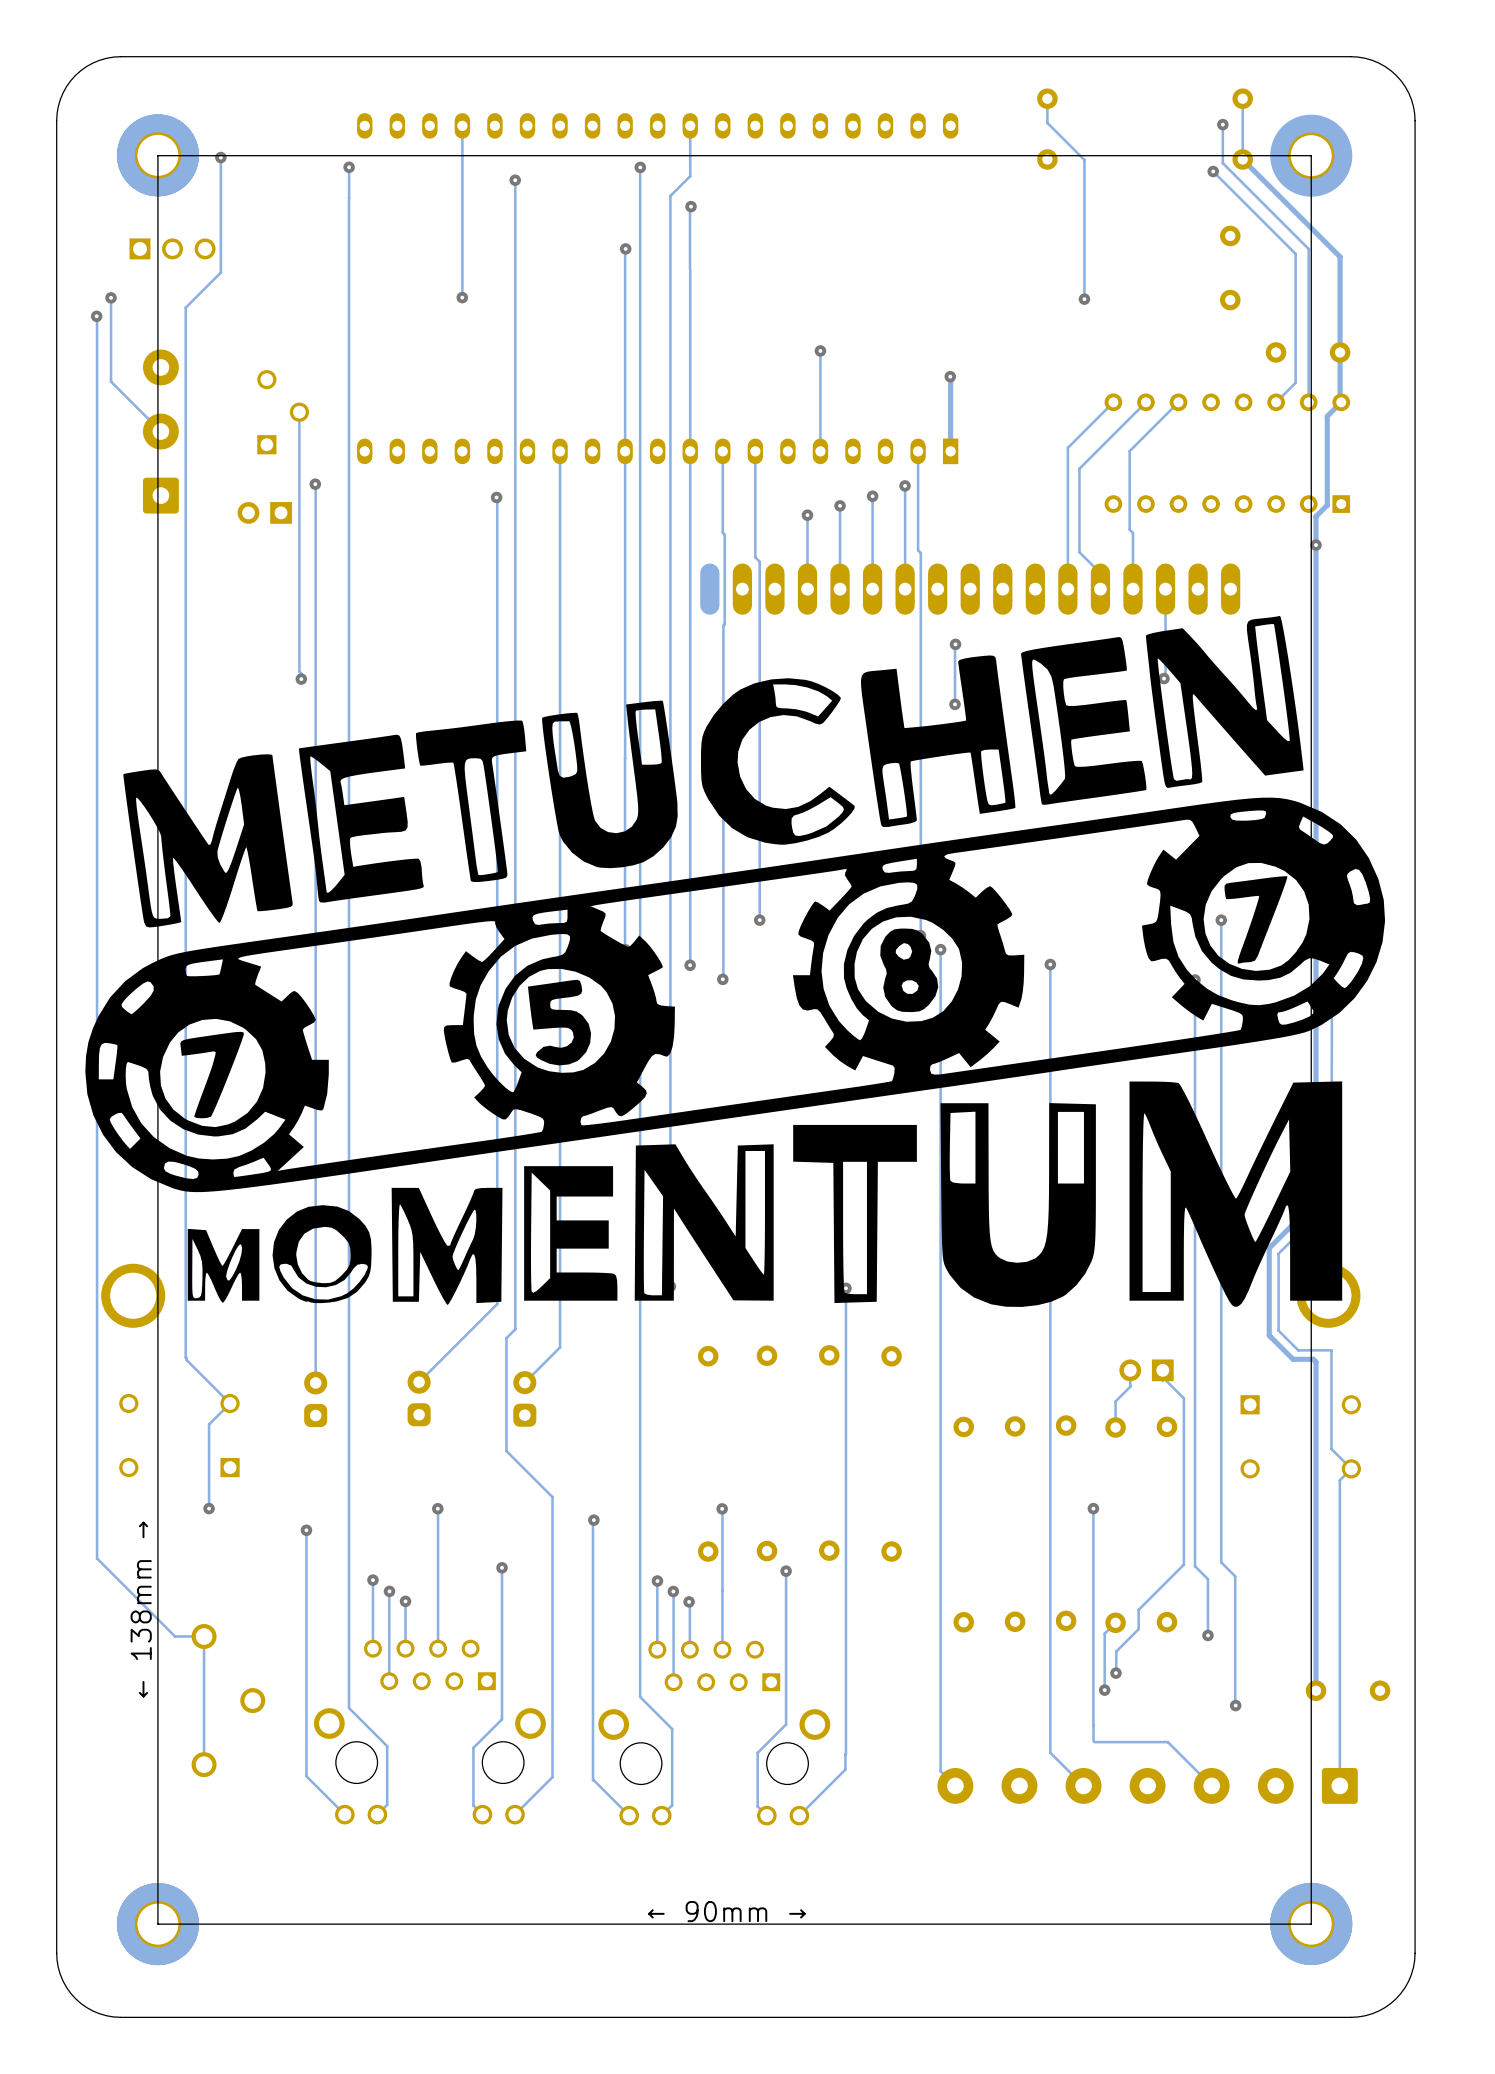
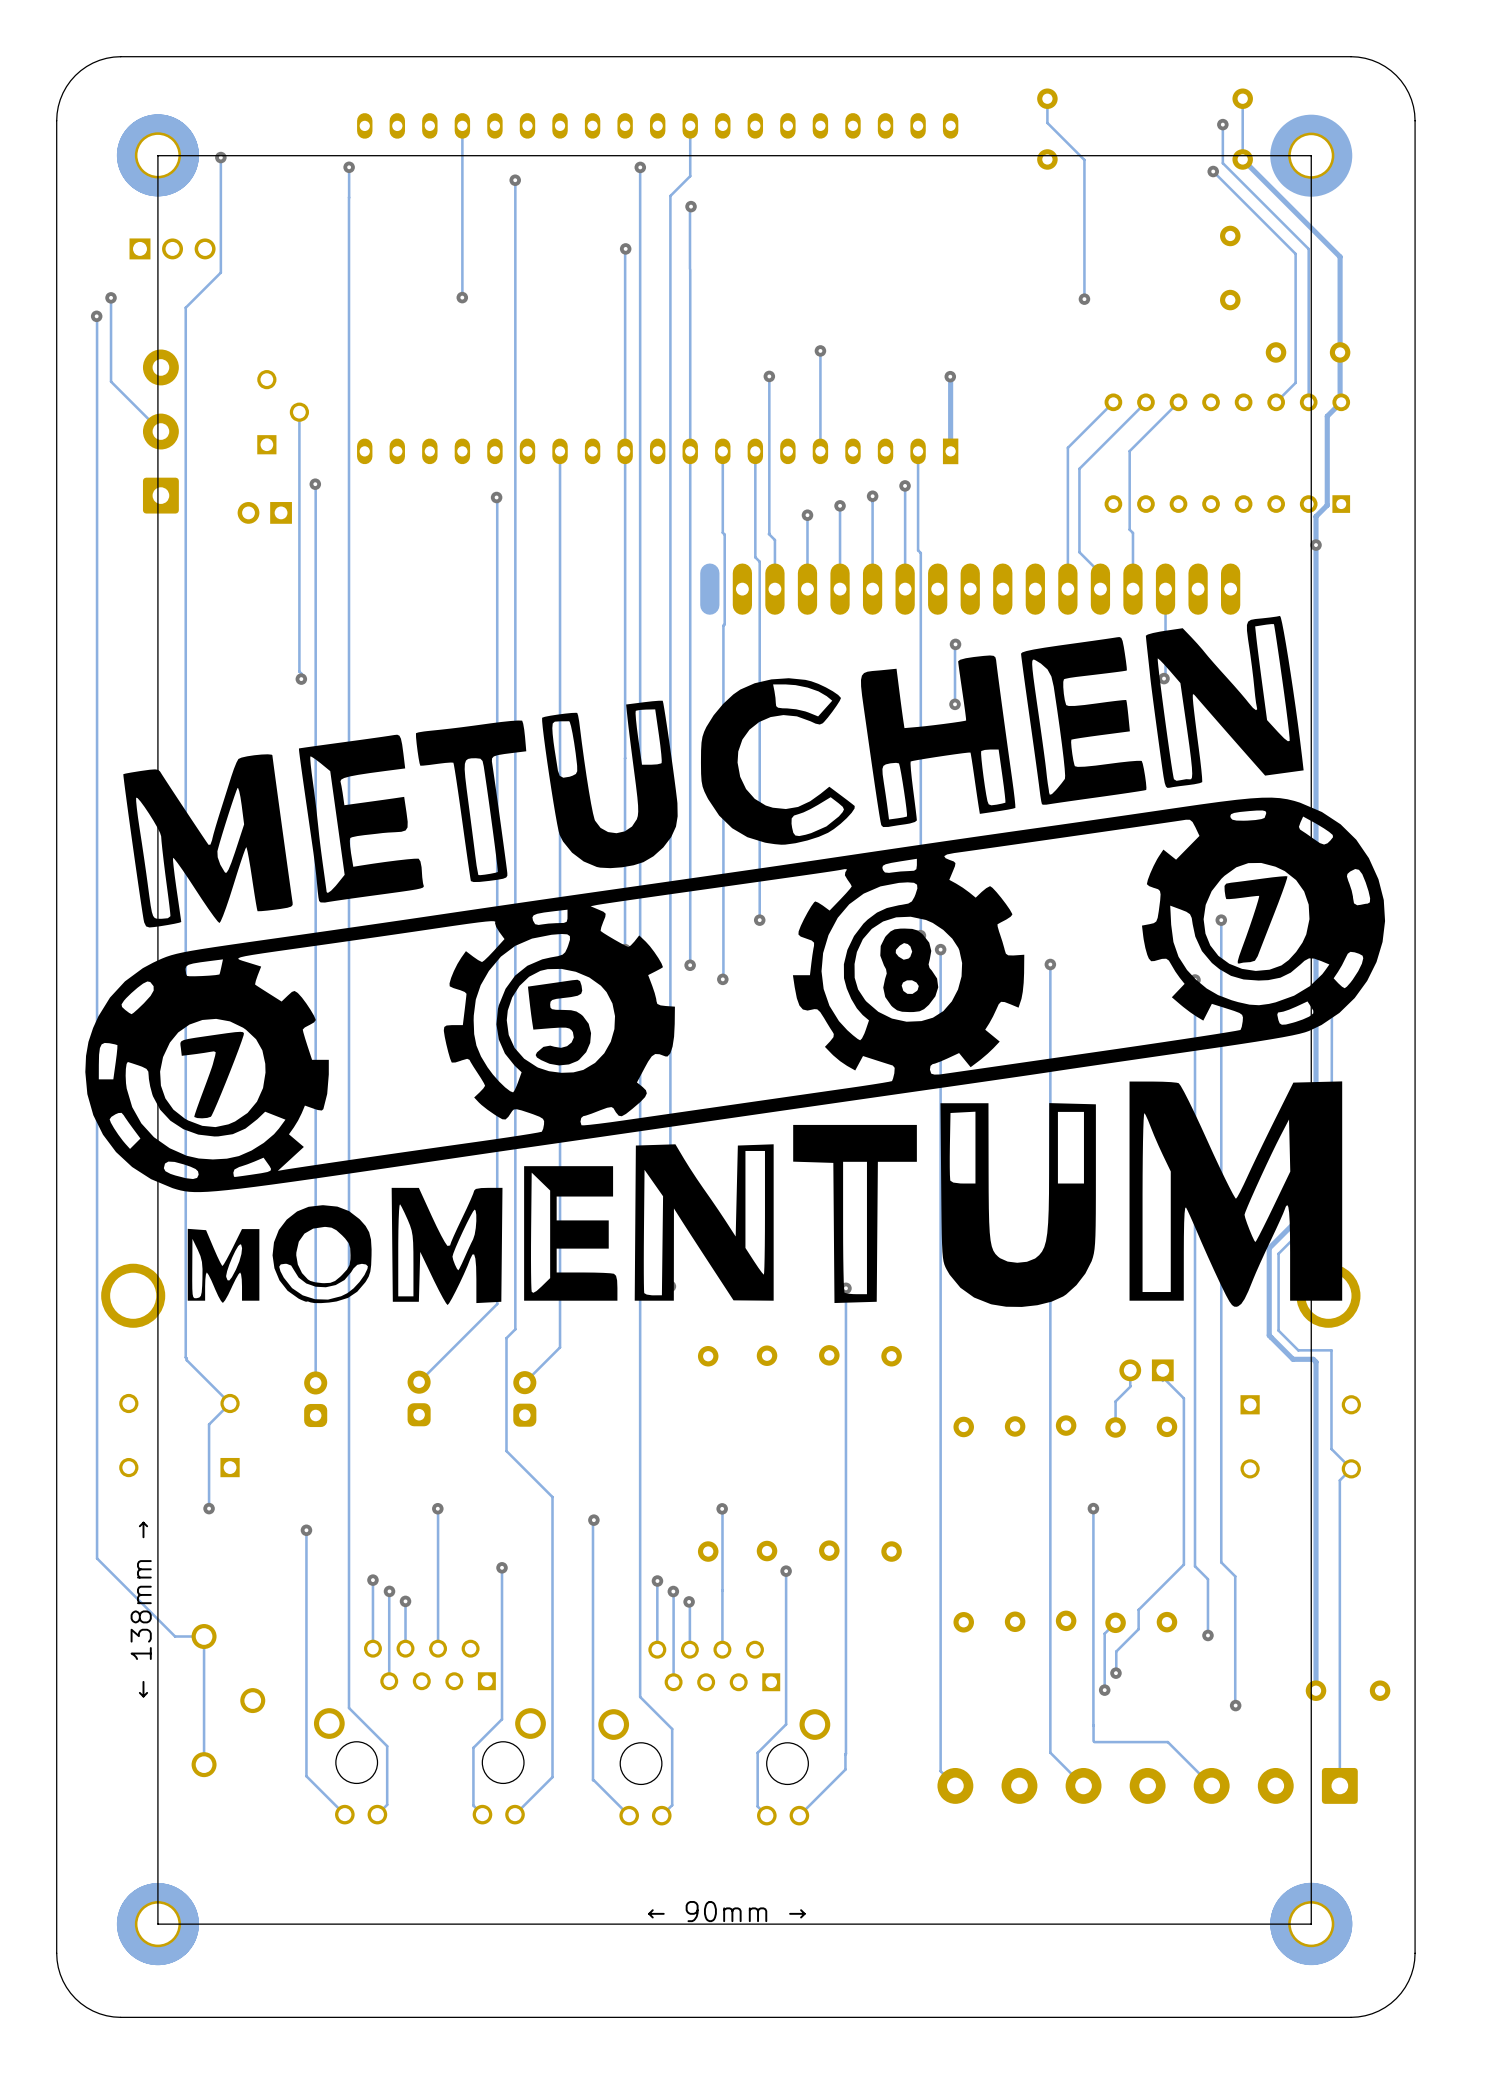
track: none -> (769, 376) (768, 534) (774, 540) (774, 589)
via: none -> (769, 376)

